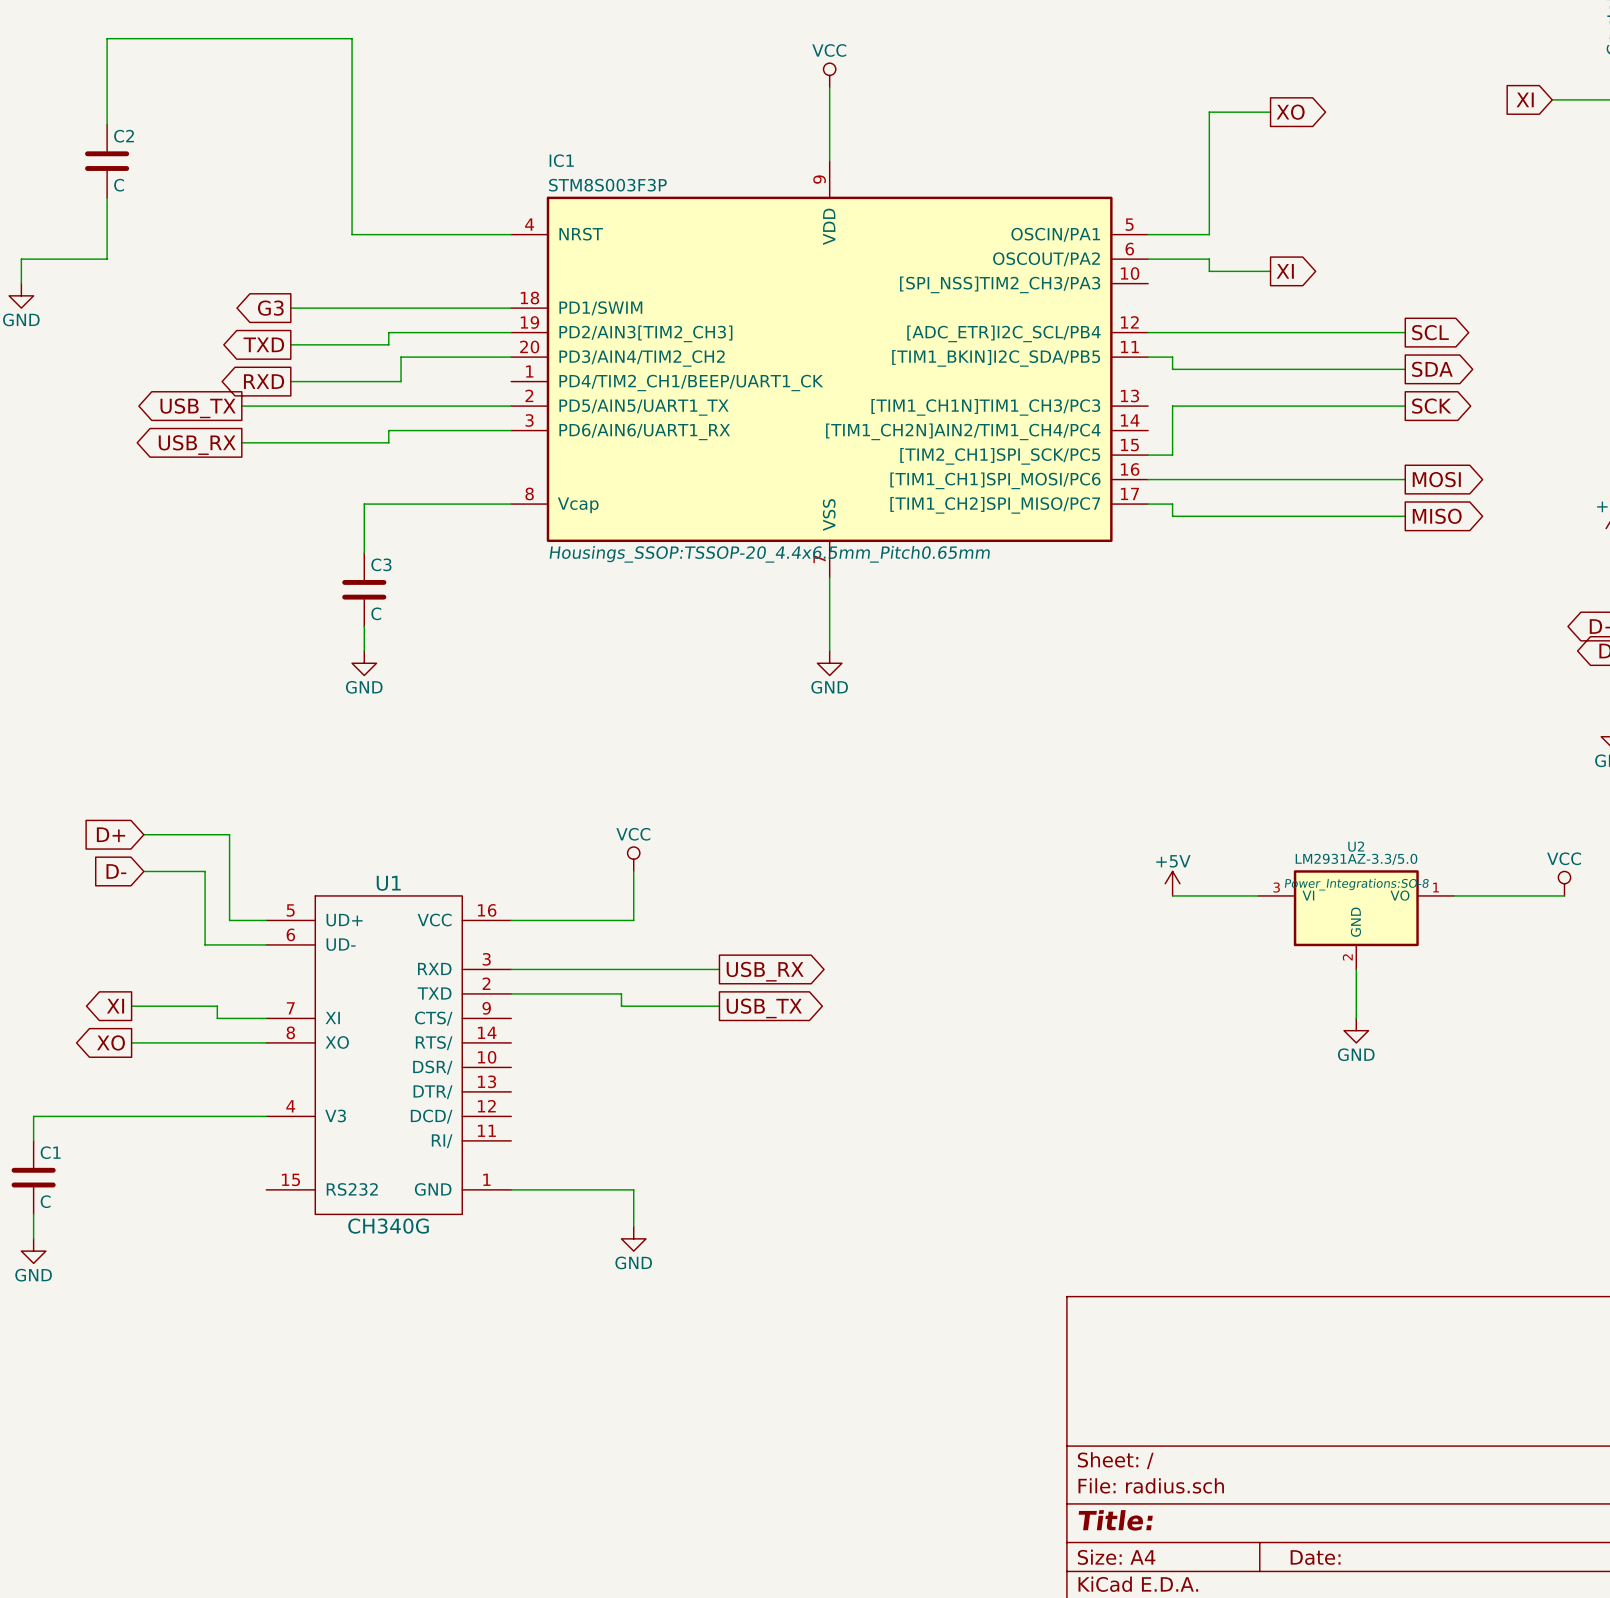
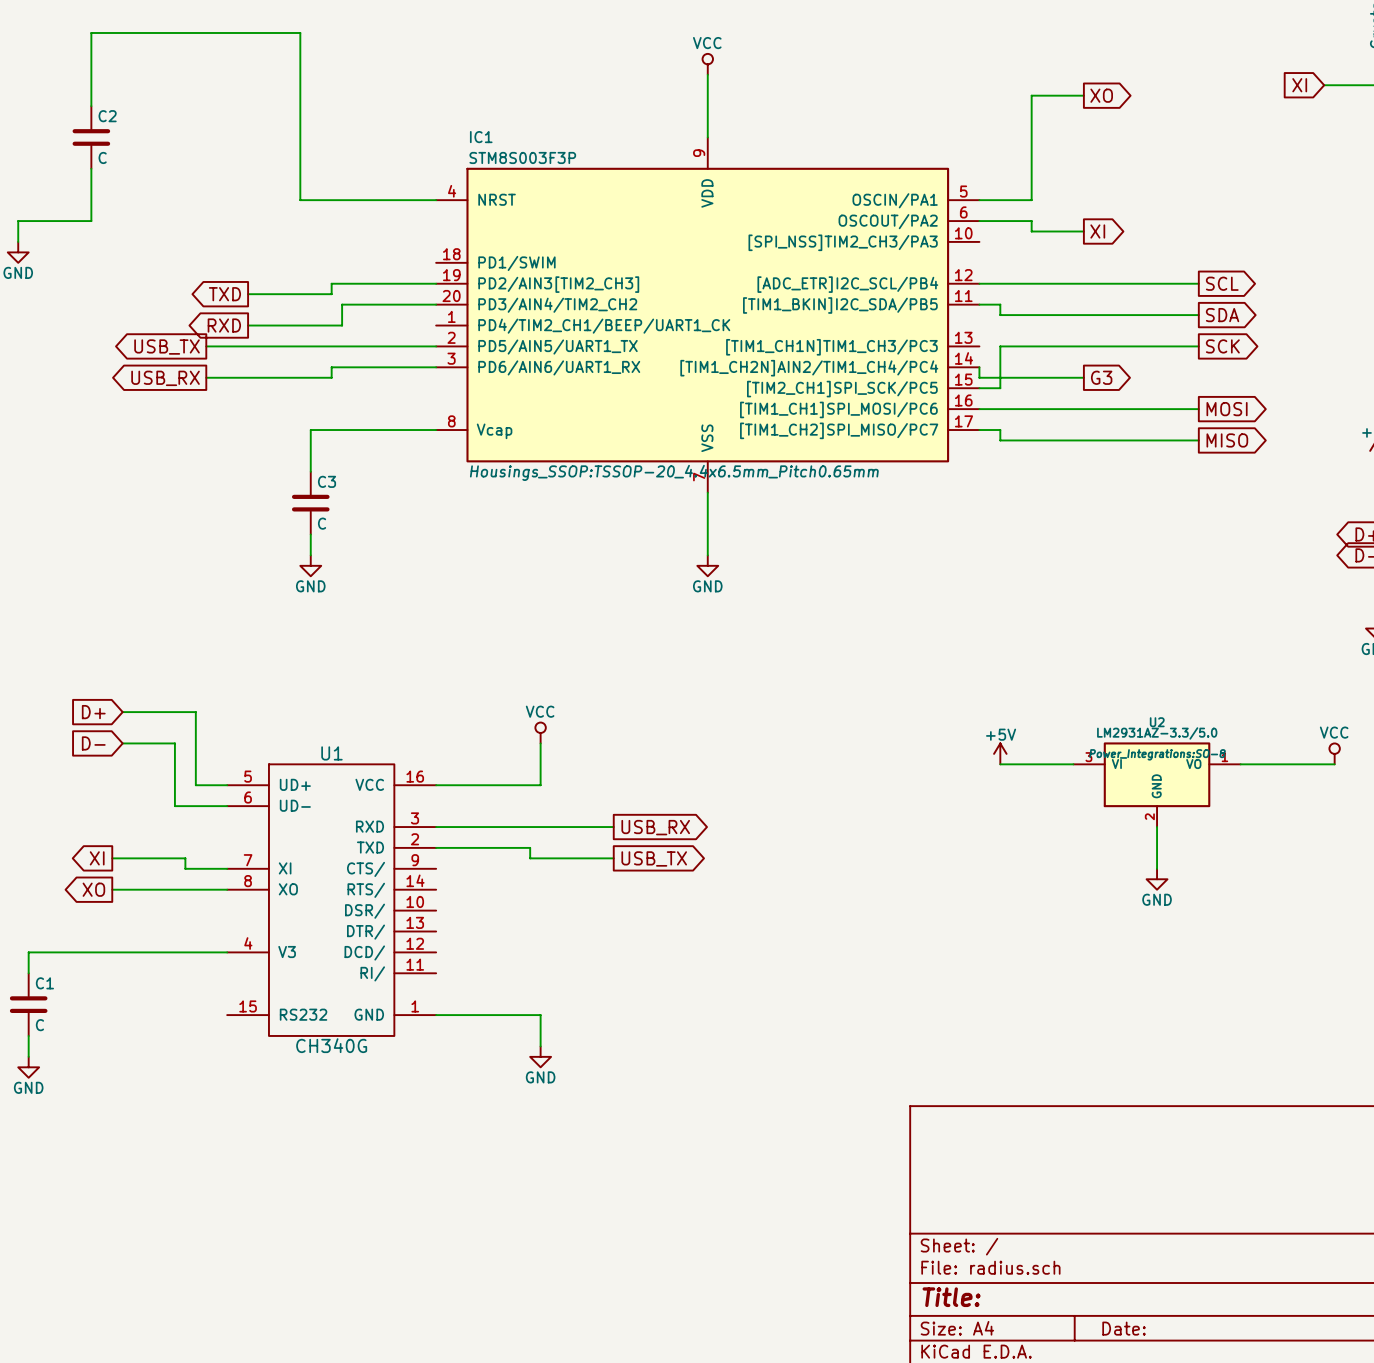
global label: G3 (270, 308) -> none
wire: (290, 308) (511, 308) -> none
wire: none -> (979, 367) (979, 377) (1083, 377)
global label: none -> G3 (1101, 377)

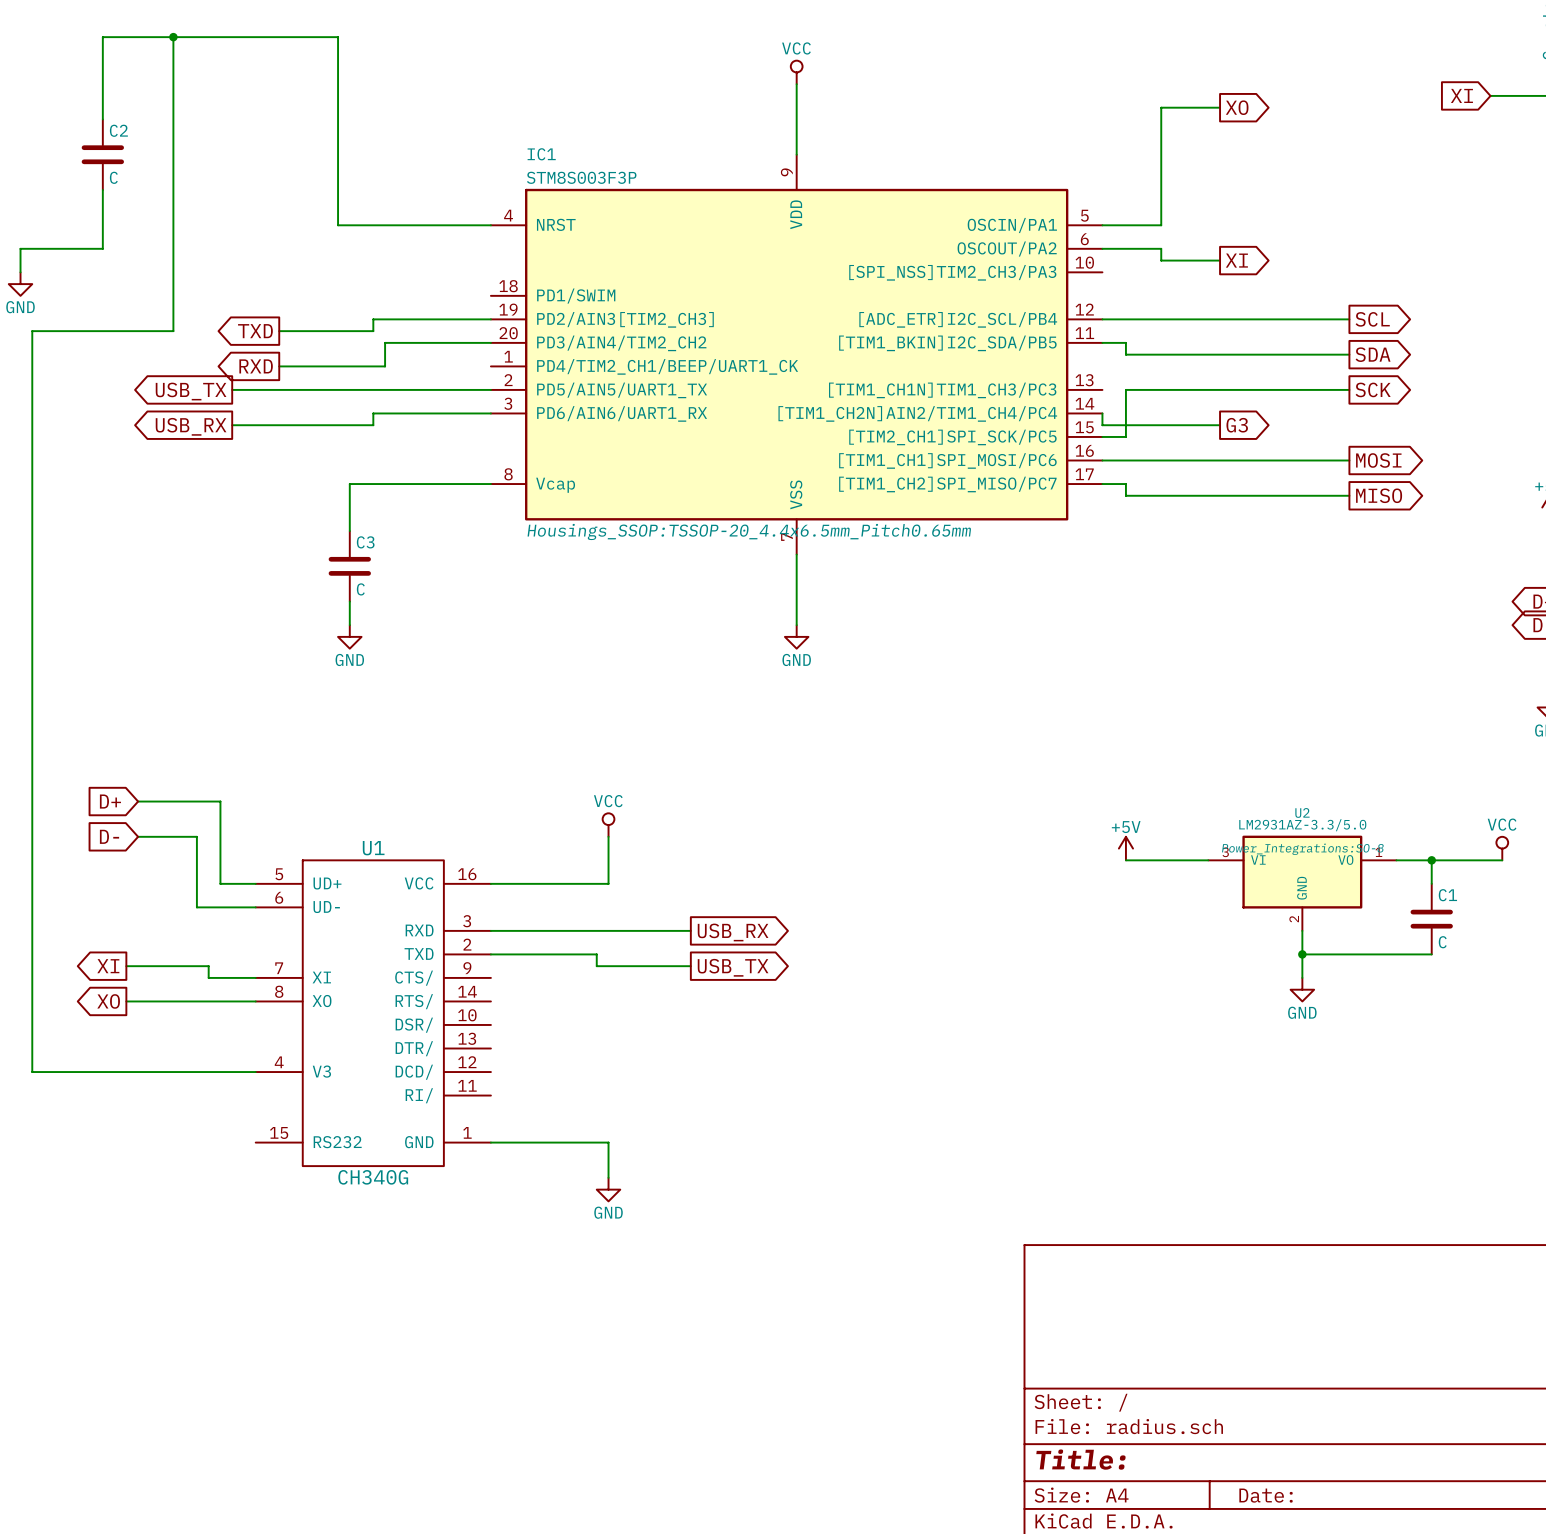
junction: none -> (173, 37)
wire: none -> (1431, 860) (1431, 883)
junction: none -> (1431, 860)
wire: none -> (1302, 954) (1431, 954)
junction: none -> (1302, 954)
wire: (28, 952) (28, 973) -> (32, 1072) (32, 331) (173, 331) (173, 37)
C1 position: (28, 1004) -> (1431, 919)
wire: (28, 1035) (28, 1056) -> none
power symbol: GND (28, 1067) -> none

